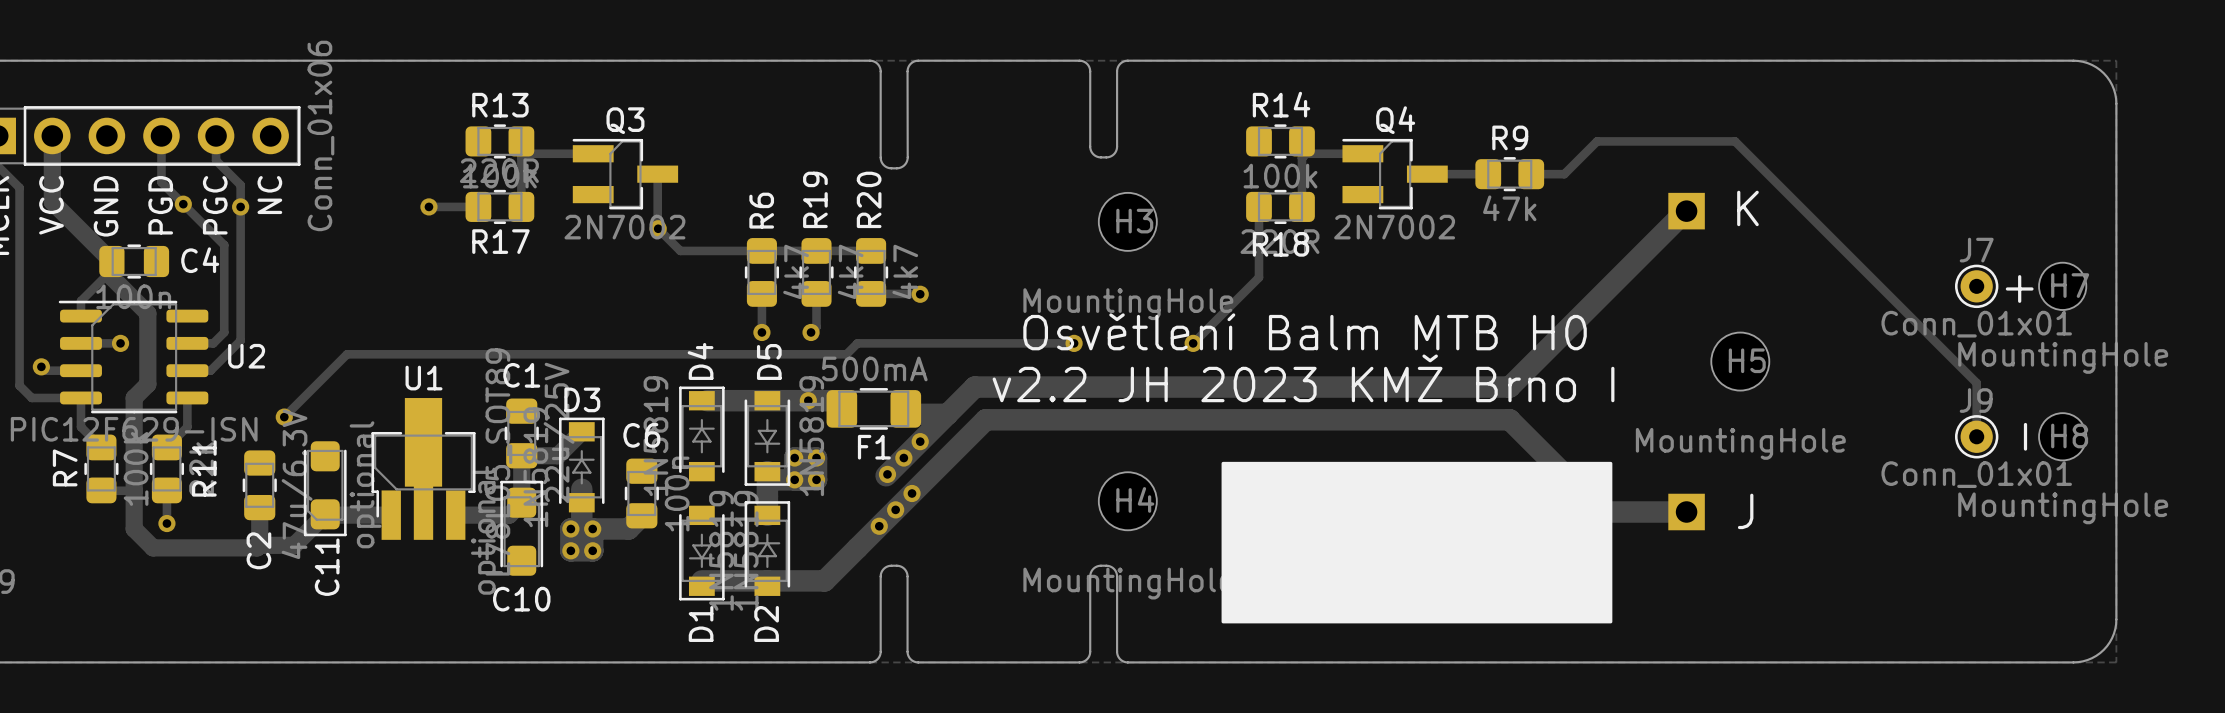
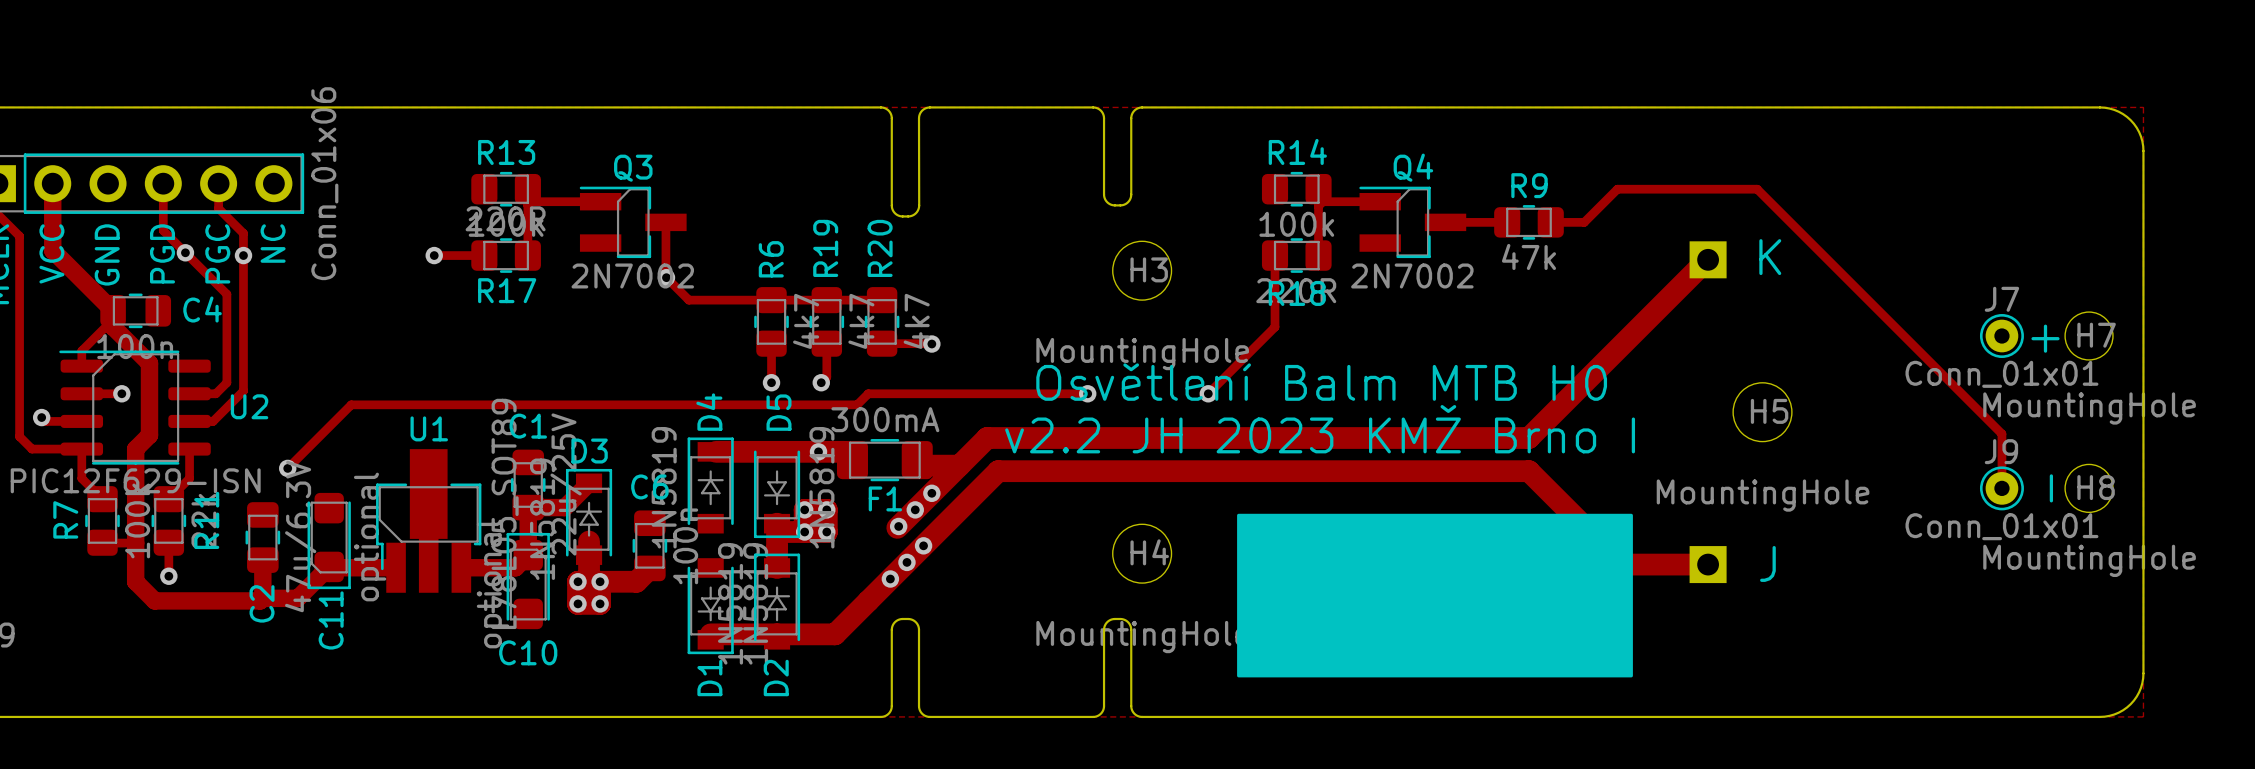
F1 value: 500mA (874, 368) -> 300mA (885, 419)

